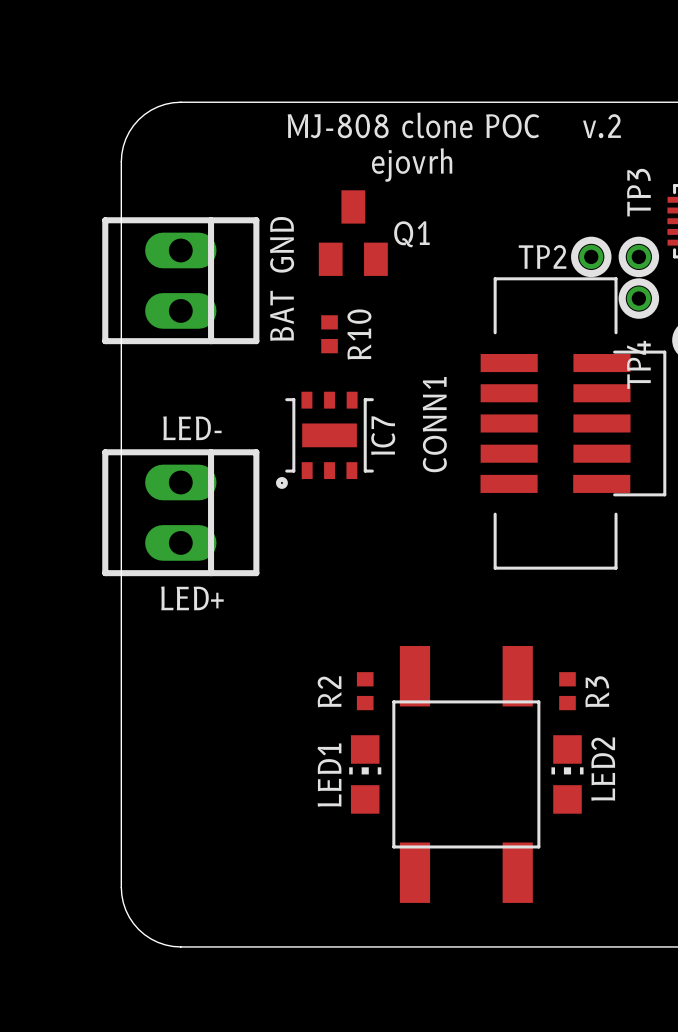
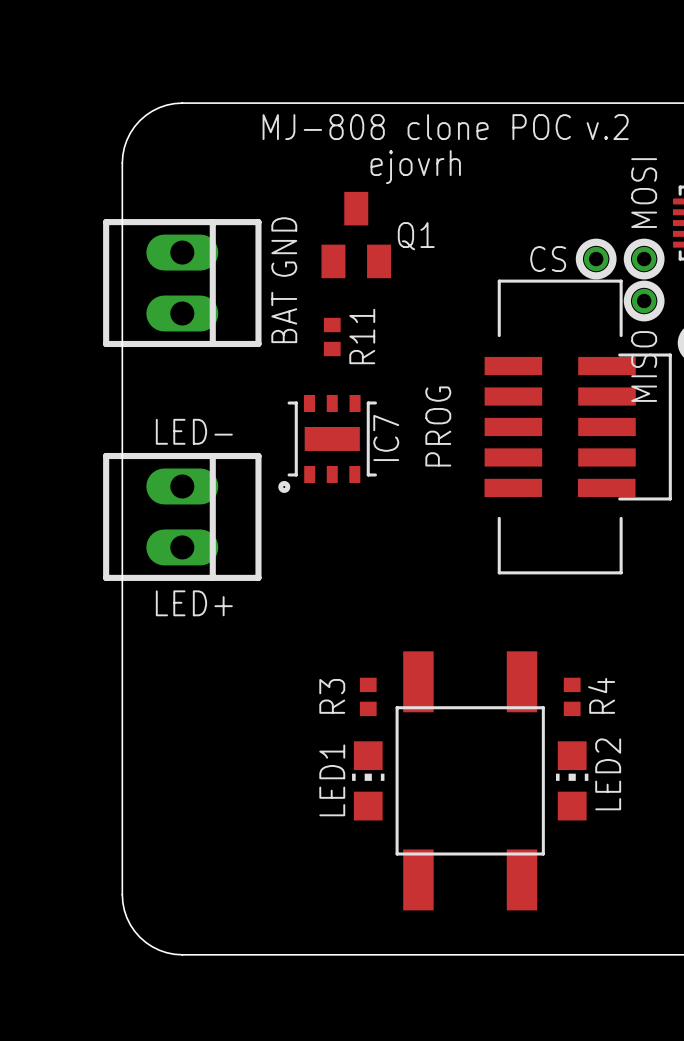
TP3 name: TP3 (638, 192) -> MOSI (644, 193)
TP2 name: TP2 (542, 256) -> CS (548, 259)
R10 name: R10 (359, 334) -> R11 (362, 336)
TP4 name: TP4 (638, 364) -> MISO (644, 366)
CONN1 name: CONN1 (434, 424) -> PROG (438, 426)
R2 name: R2 (329, 691) -> R3 (332, 696)
R3 name: R3 (597, 691) -> R4 (601, 695)

